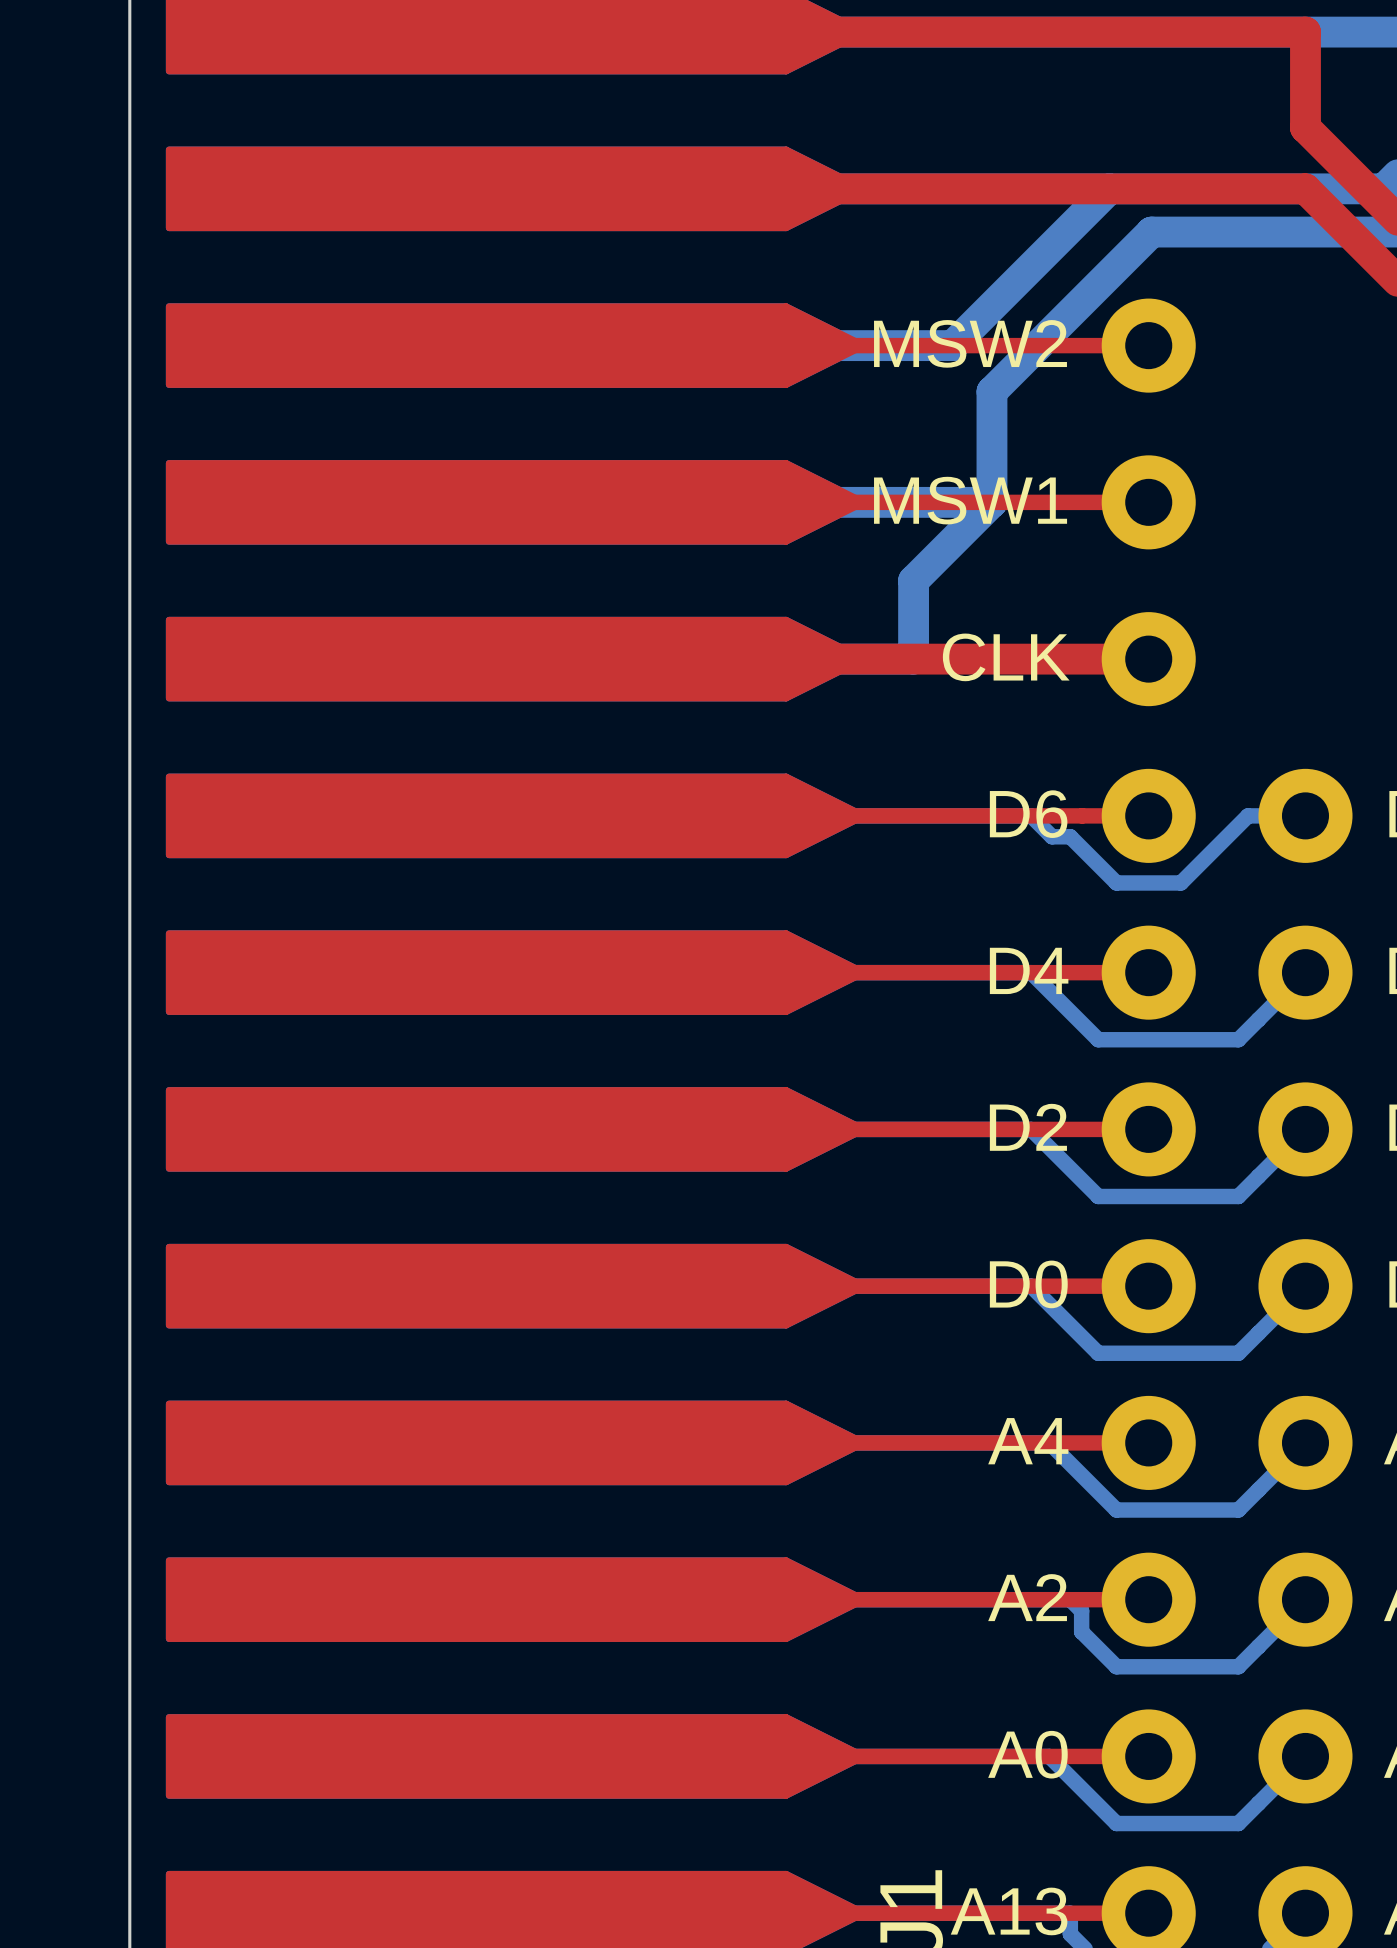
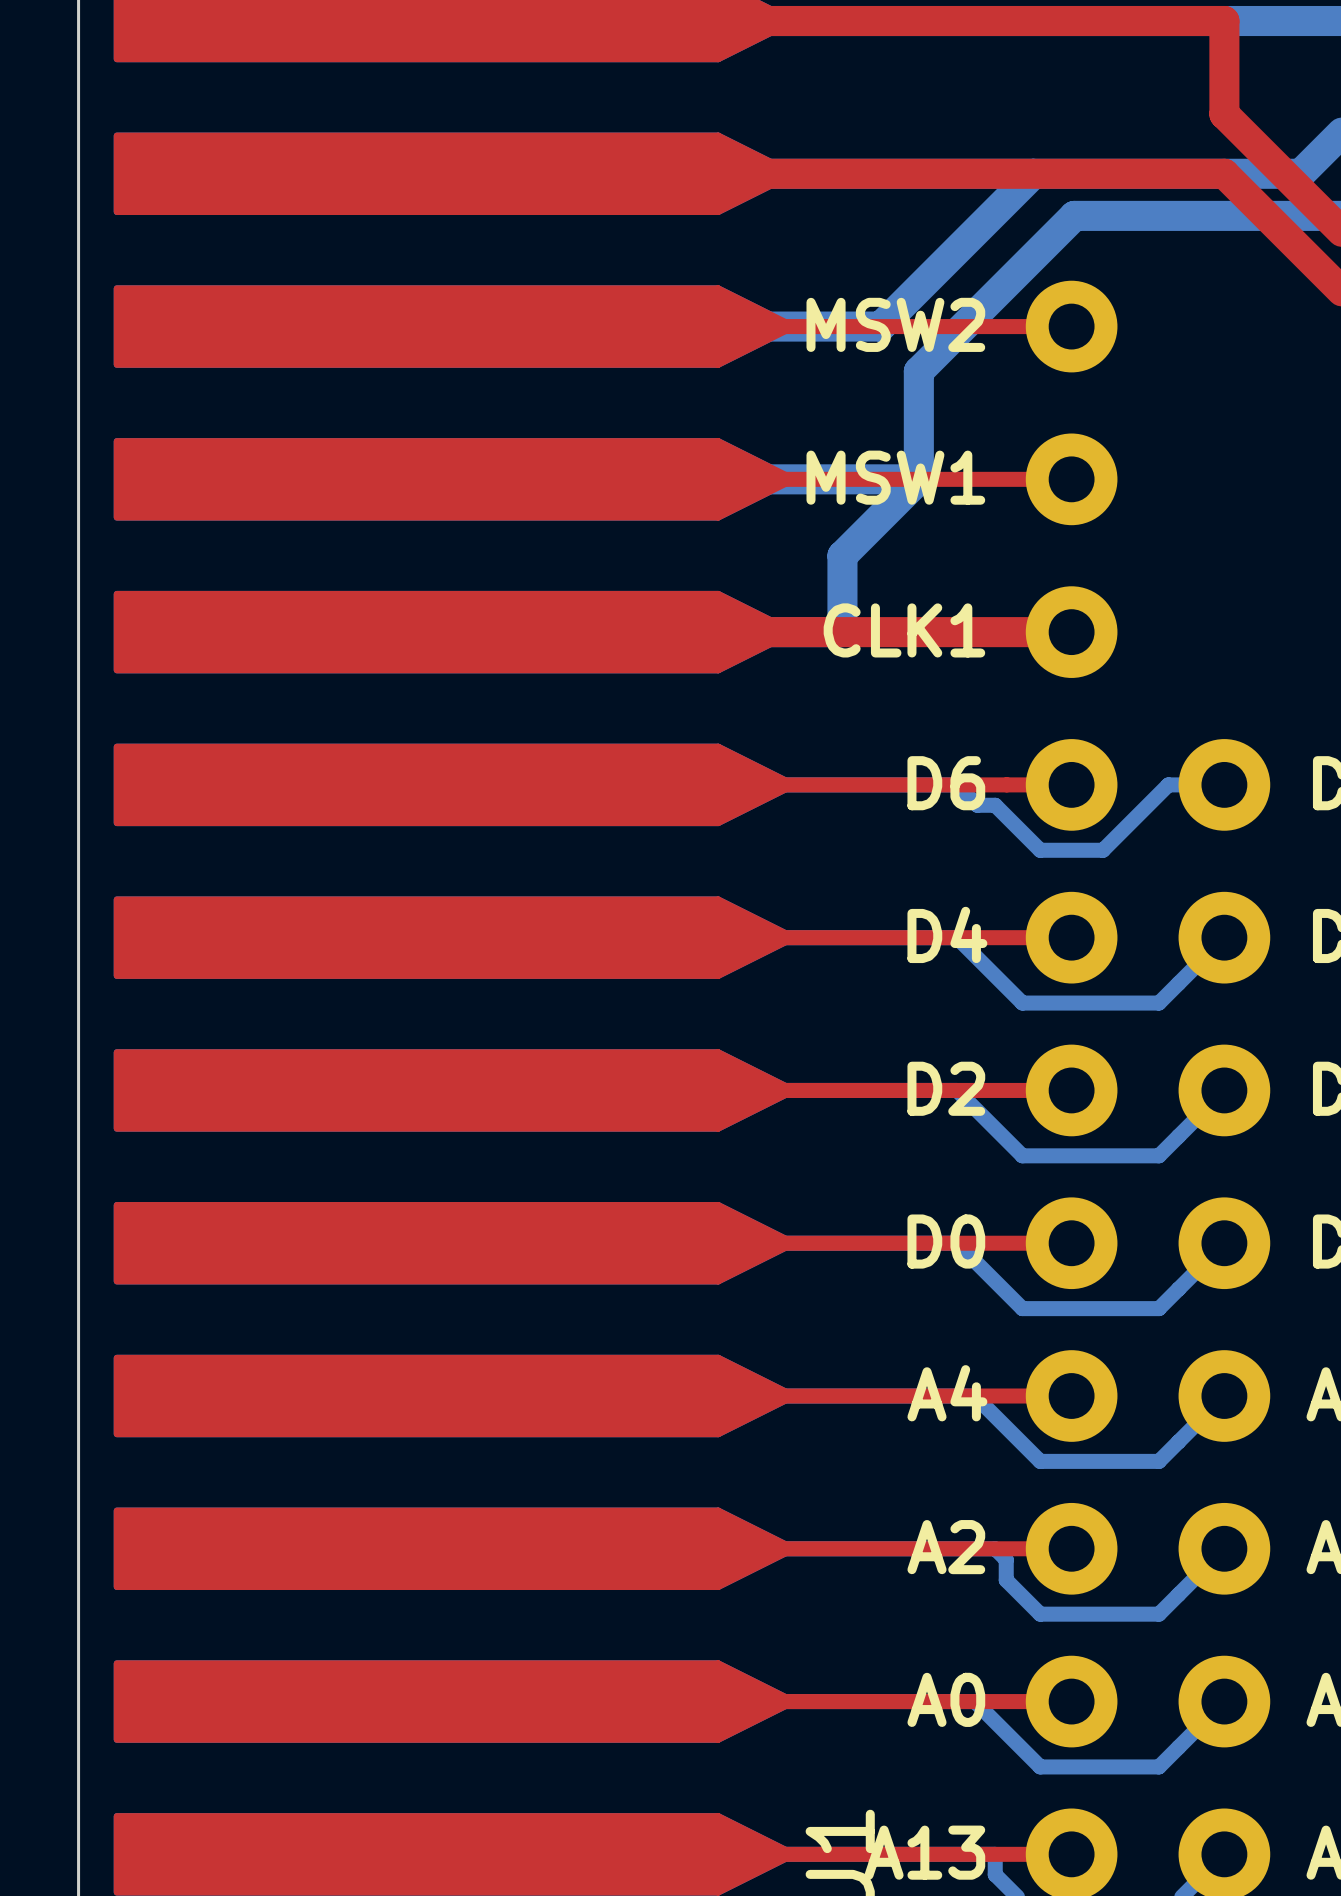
CLK name: CLK (1006, 657) -> CLK1 (904, 630)

